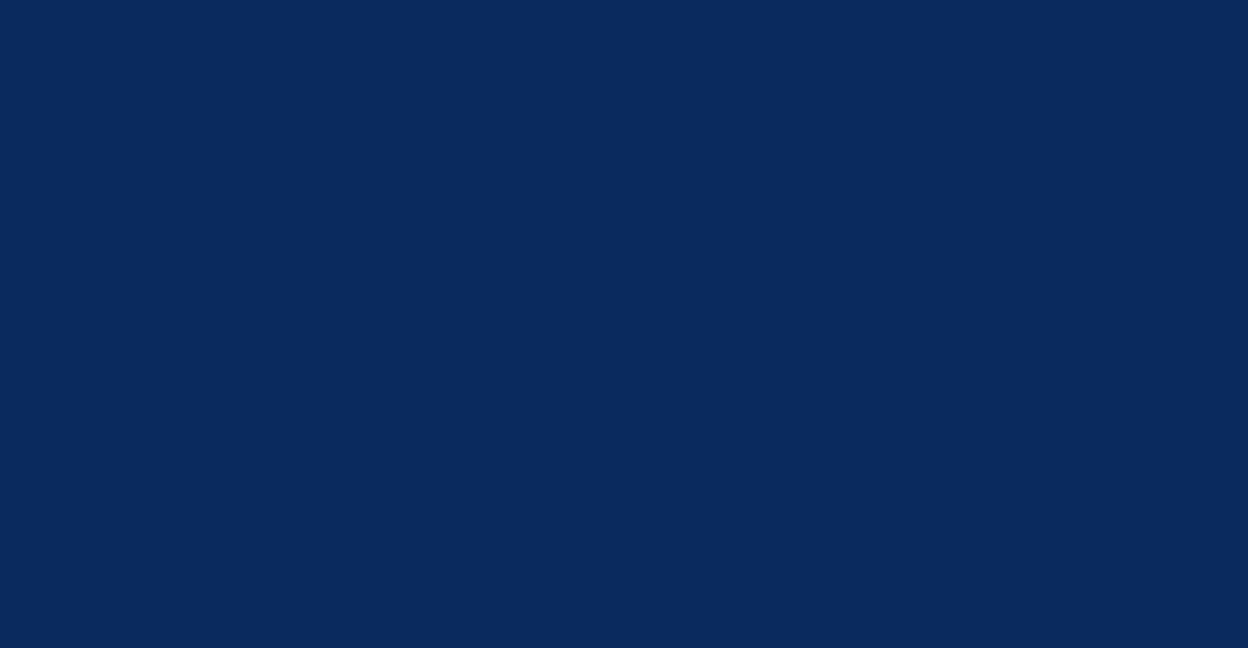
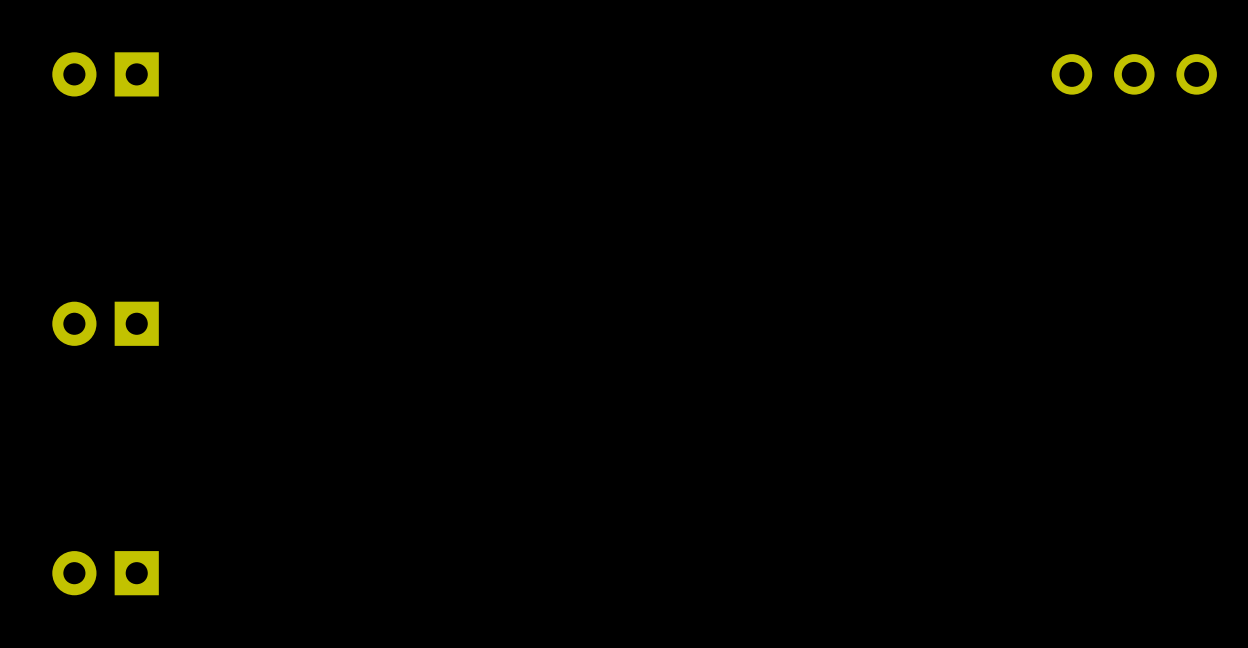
part: none -> (105, 74)
part: none -> (1134, 74)
part: none -> (105, 323)
part: none -> (105, 573)

